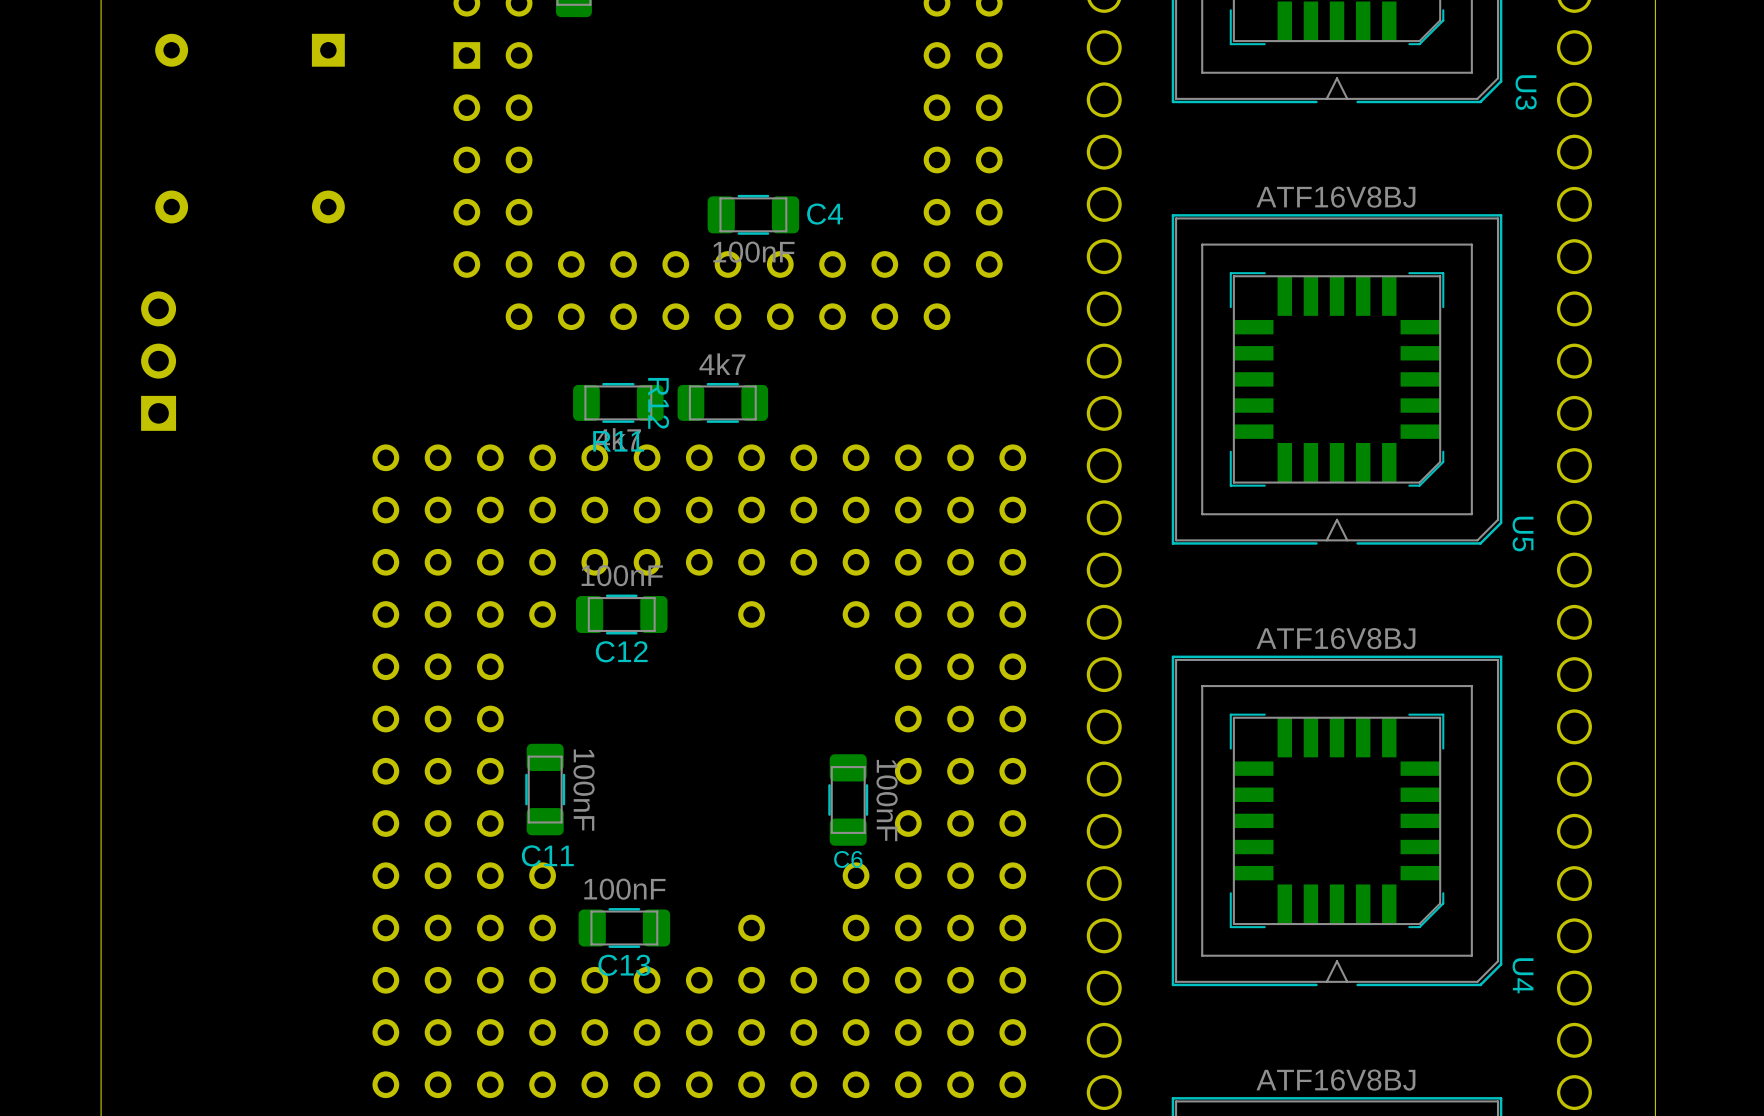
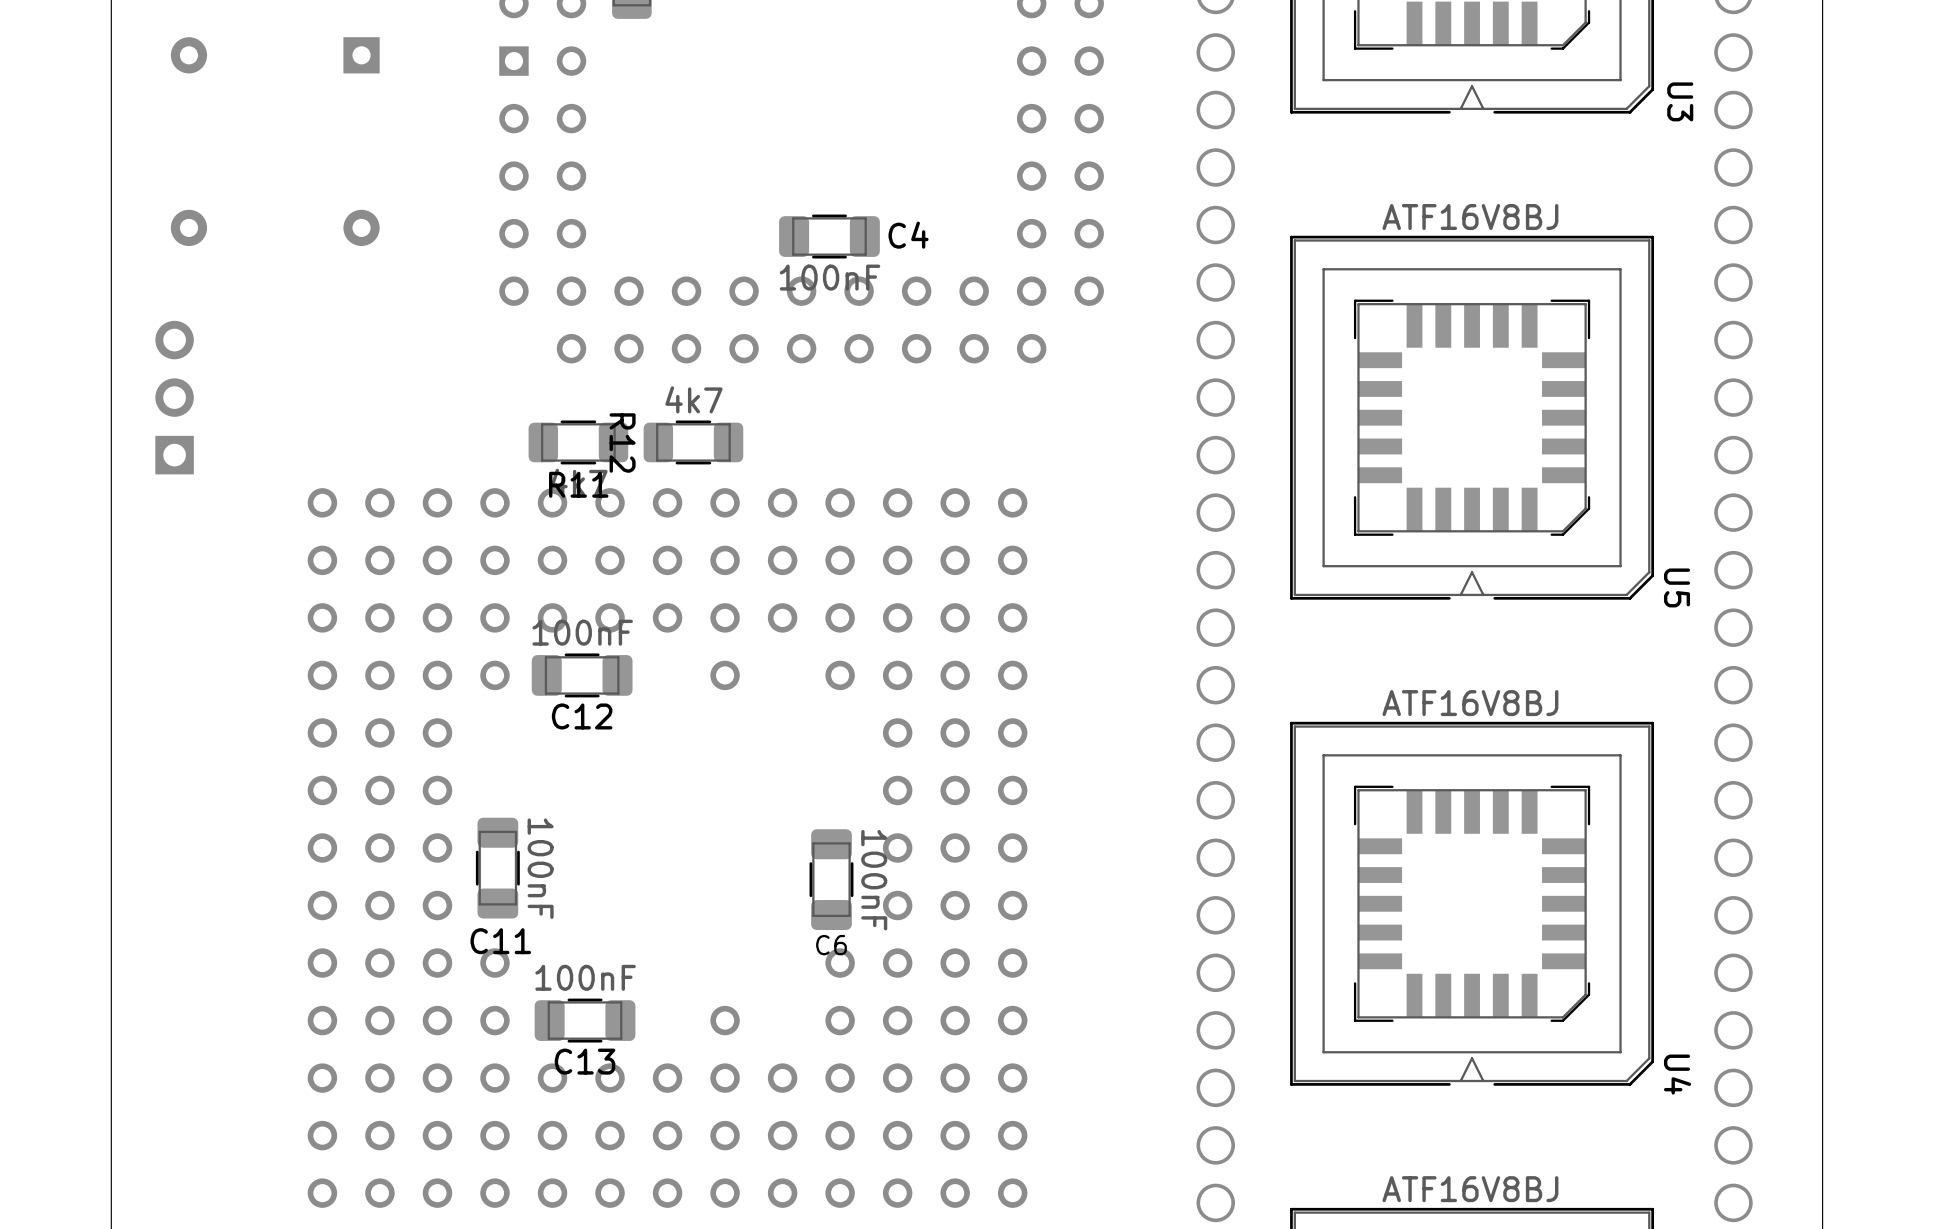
R11 position: (618, 402) -> (578, 442)
R12 position: (722, 402) -> (693, 442)
C12 position: (621, 614) -> (582, 675)
part position: (699, 771) -> (667, 847)
C11 position: (545, 789) -> (497, 868)
C6 position: (848, 799) -> (831, 879)
C13 position: (624, 928) -> (585, 1020)

